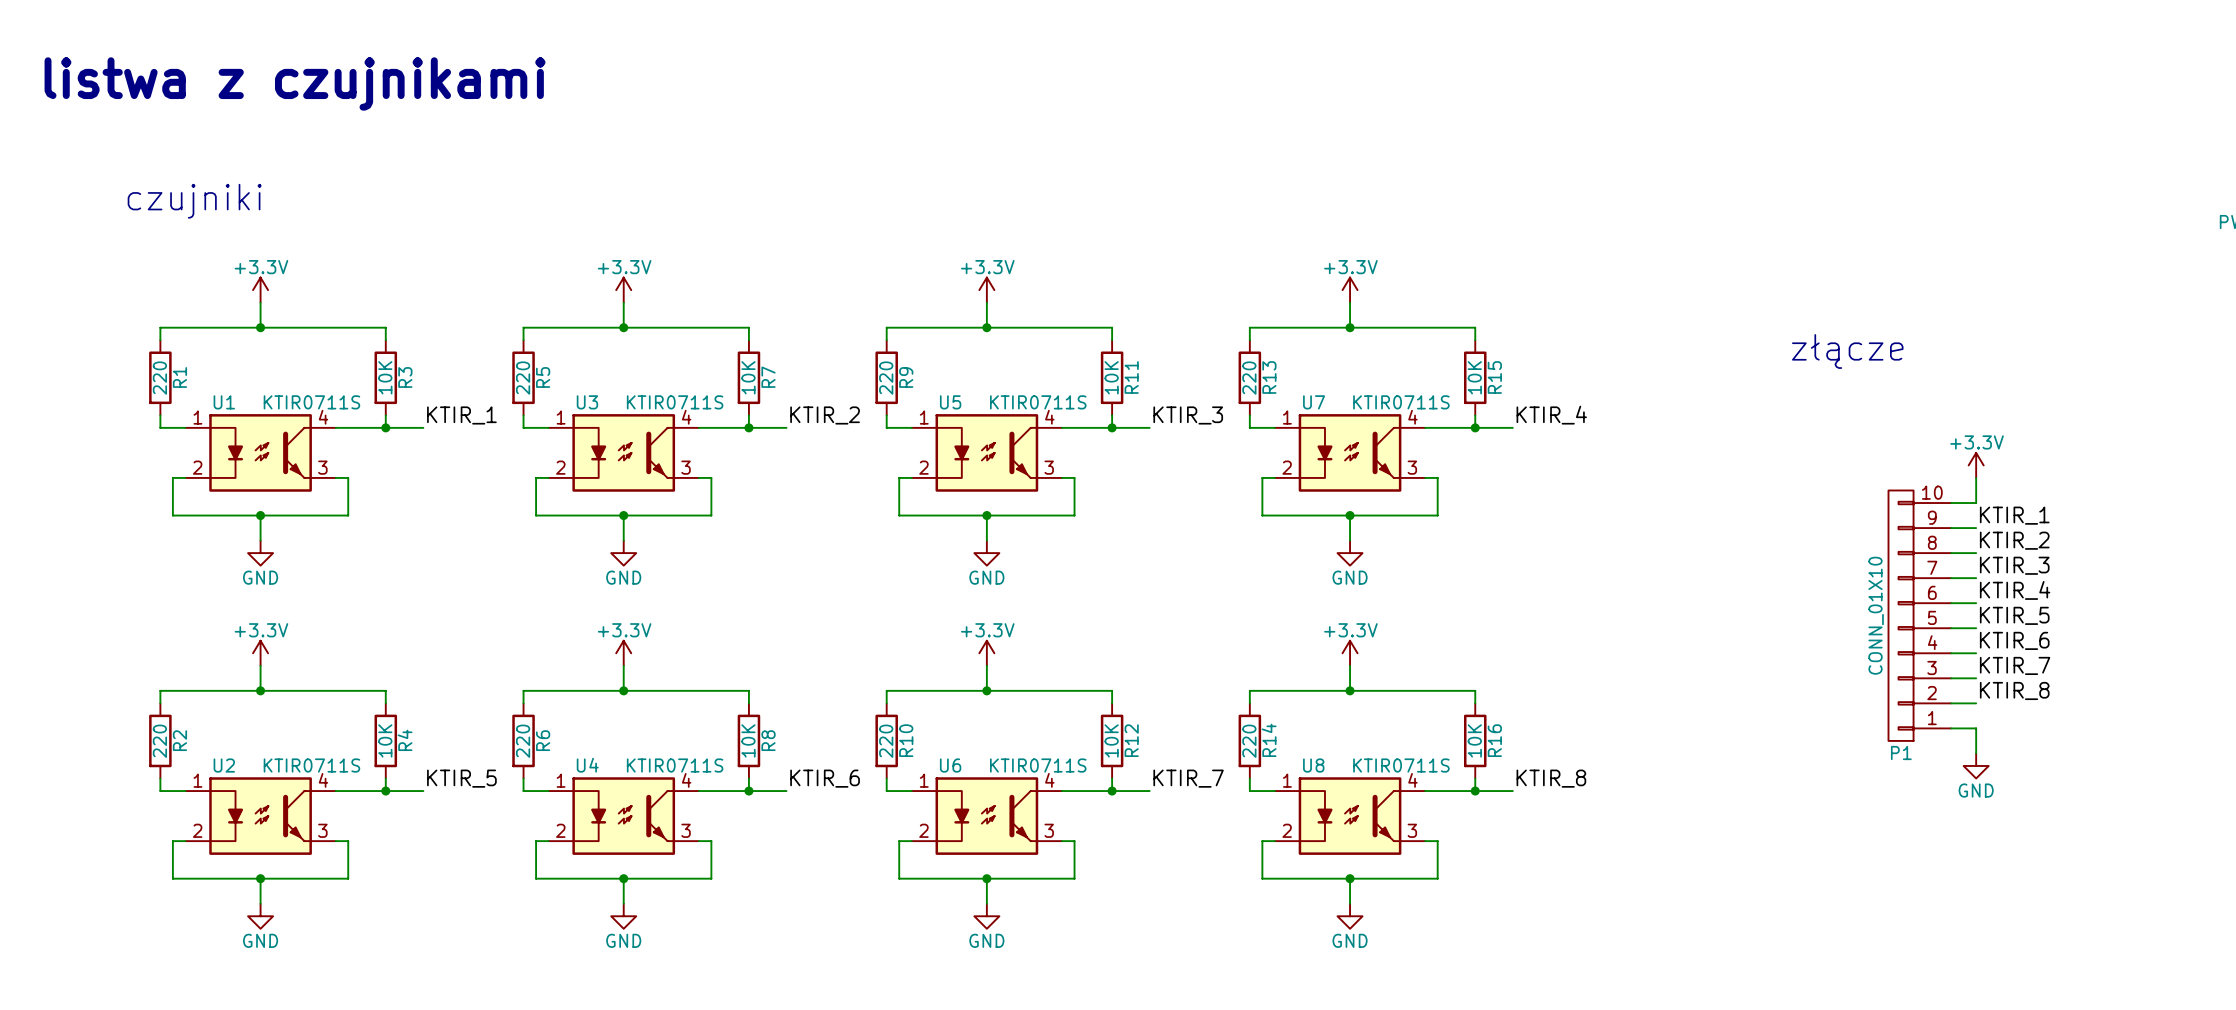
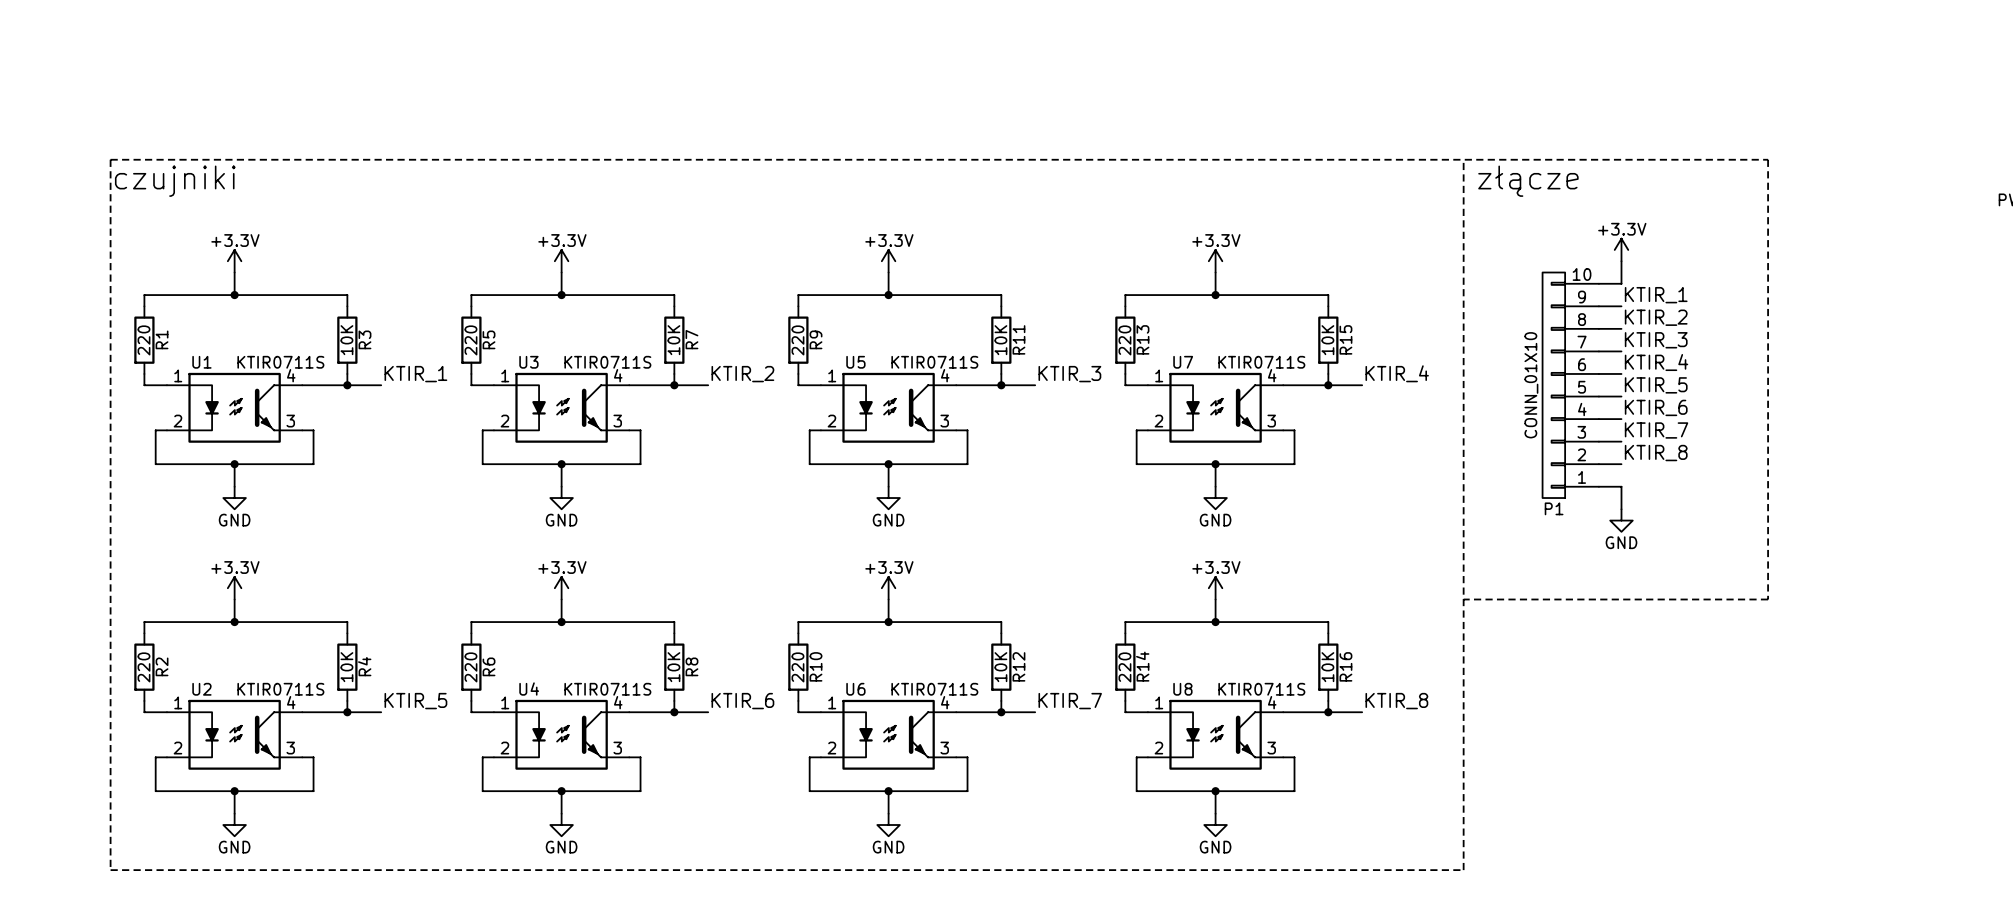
text: listwa z czujnikami (295, 83) -> none
line: none -> (1463, 159) (1463, 870) (110, 870) (110, 159) (1768, 159) (1768, 599) (1463, 599)
power symbol: none -> +3.3V (1621, 249)
wire: none -> (1621, 261) (1621, 283) (1598, 283)
label: none -> KTIR_1 (1656, 295)
wire: none -> (1598, 306) (1621, 306)
text position: złącze (1847, 351) -> złącze (1528, 181)
label: none -> KTIR_2 (1656, 317)
label: none -> KTIR_3 (1656, 340)
label: none -> KTIR_4 (1656, 362)
label: none -> KTIR_5 (1656, 385)
label: none -> KTIR_6 (1656, 407)
power symbol: +3.3V (1976, 465) -> none
wire: (1976, 477) (1976, 503) (1951, 503) -> none
label: none -> KTIR_7 (1656, 430)
label: none -> KTIR_8 (1656, 453)
label: KTIR_1 (2014, 515) -> none
wire: (1951, 528) (1976, 528) -> (1598, 328) (1621, 328)
wire: none -> (1598, 486) (1621, 486) (1621, 509)
label: KTIR_2 (2014, 540) -> none
wire: (1951, 553) (1976, 553) -> (1598, 351) (1621, 351)
label: KTIR_3 (2014, 565) -> none
power symbol: none -> GND (1621, 520)
wire: (1951, 578) (1976, 578) -> (1598, 373) (1621, 373)
label: KTIR_4 (2015, 590) -> none
wire: (1951, 603) (1976, 603) -> (1598, 396) (1621, 396)
P1 position: (1919, 615) -> (1570, 385)
label: KTIR_5 (2014, 615) -> none
wire: (1951, 628) (1976, 628) -> (1598, 419) (1621, 419)
label: KTIR_6 (2014, 640) -> none
wire: (1951, 653) (1976, 653) -> (1598, 441) (1621, 441)
label: KTIR_7 (2015, 665) -> none
wire: (1951, 678) (1976, 678) -> (1598, 464) (1621, 464)
label: KTIR_8 (2014, 690) -> none
wire: (1951, 703) (1976, 703) -> none
wire: (1951, 728) (1976, 728) (1976, 753) -> none
power symbol: GND (1976, 765) -> none

